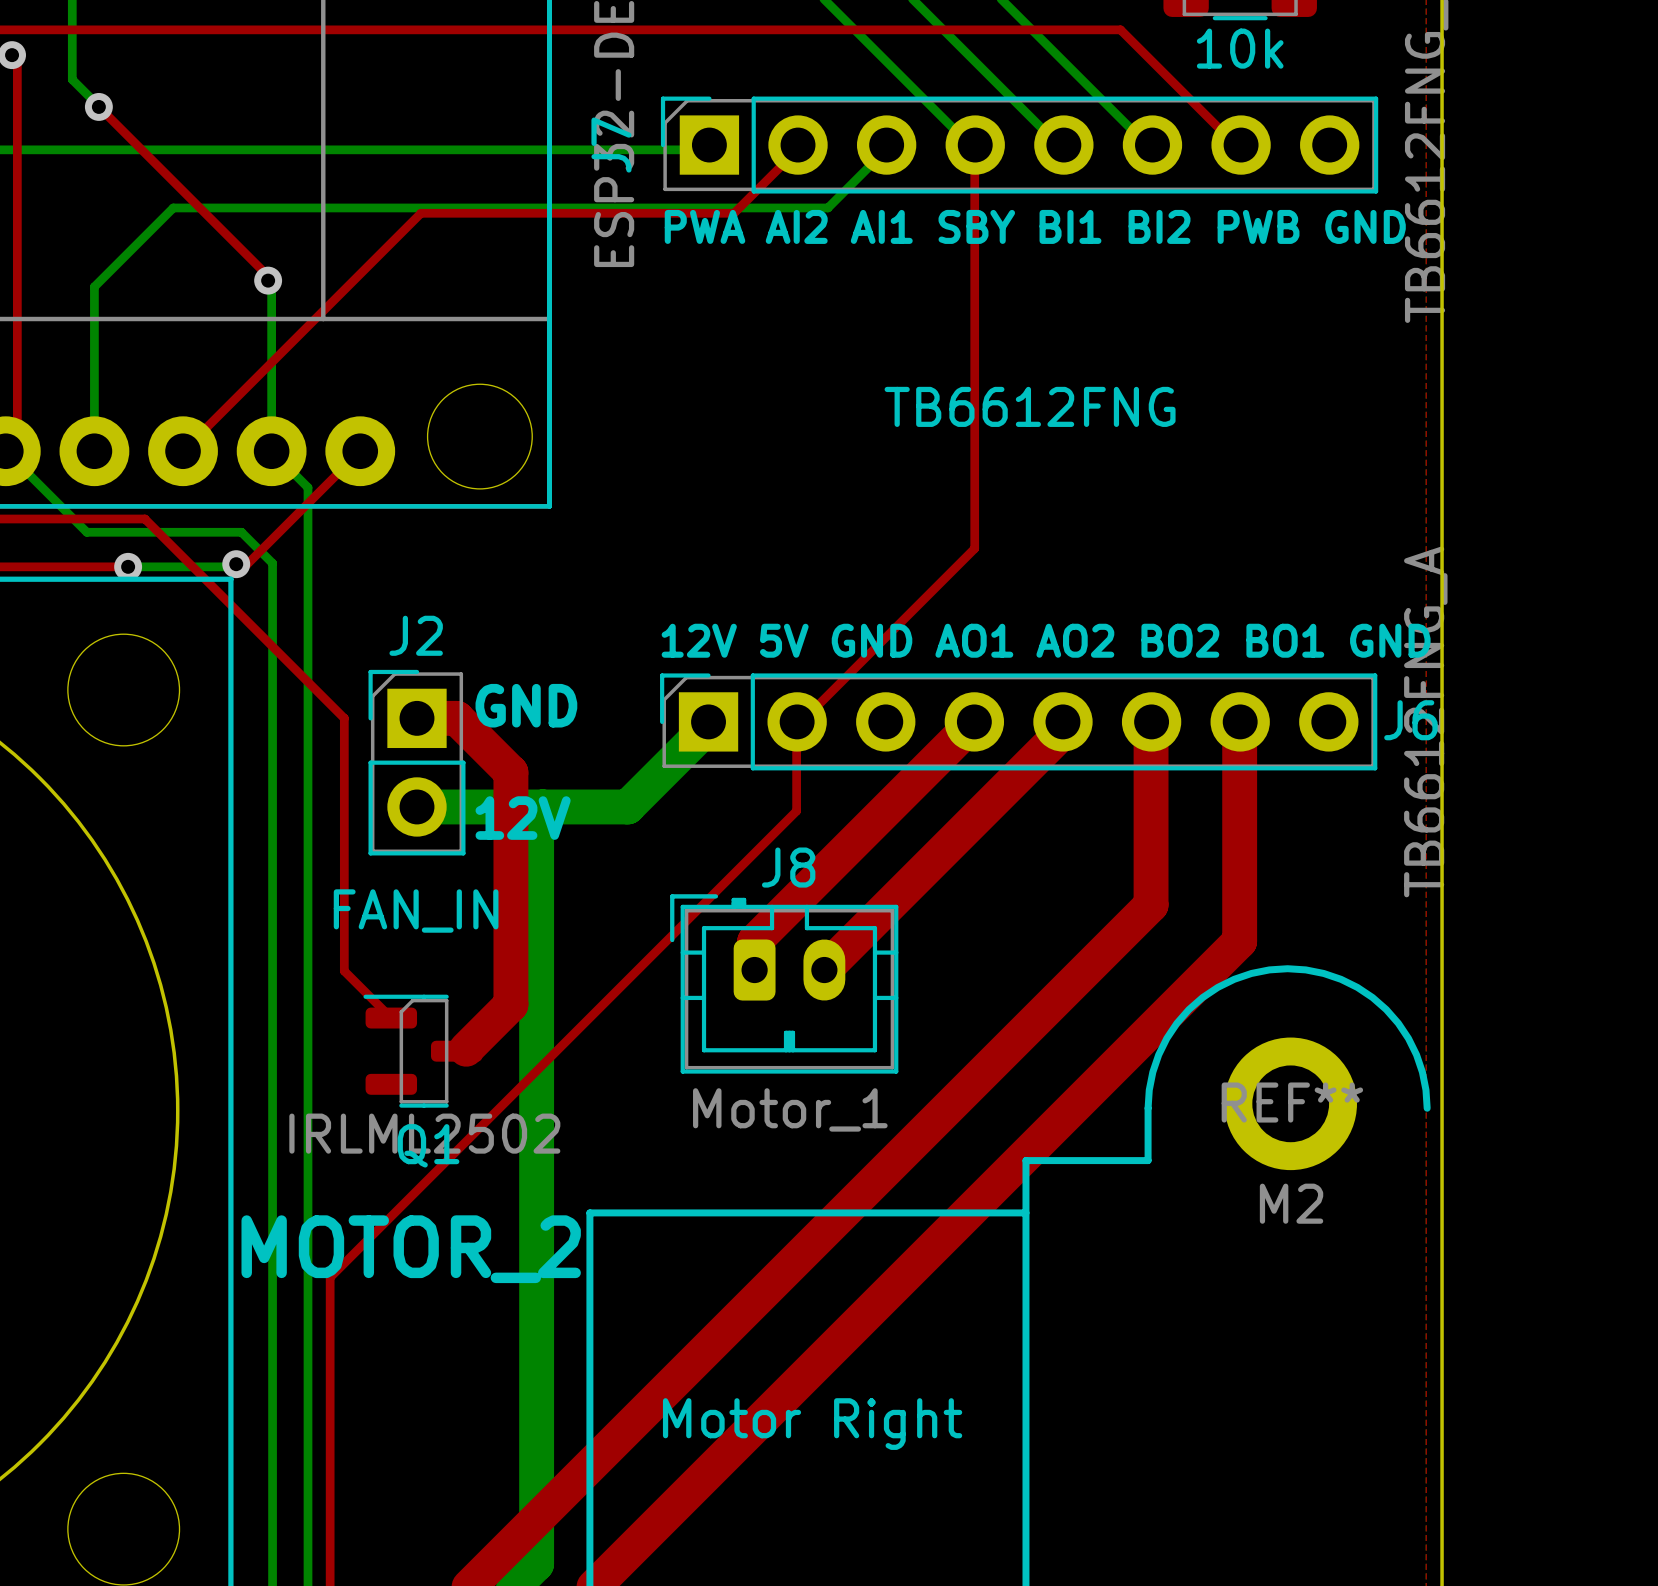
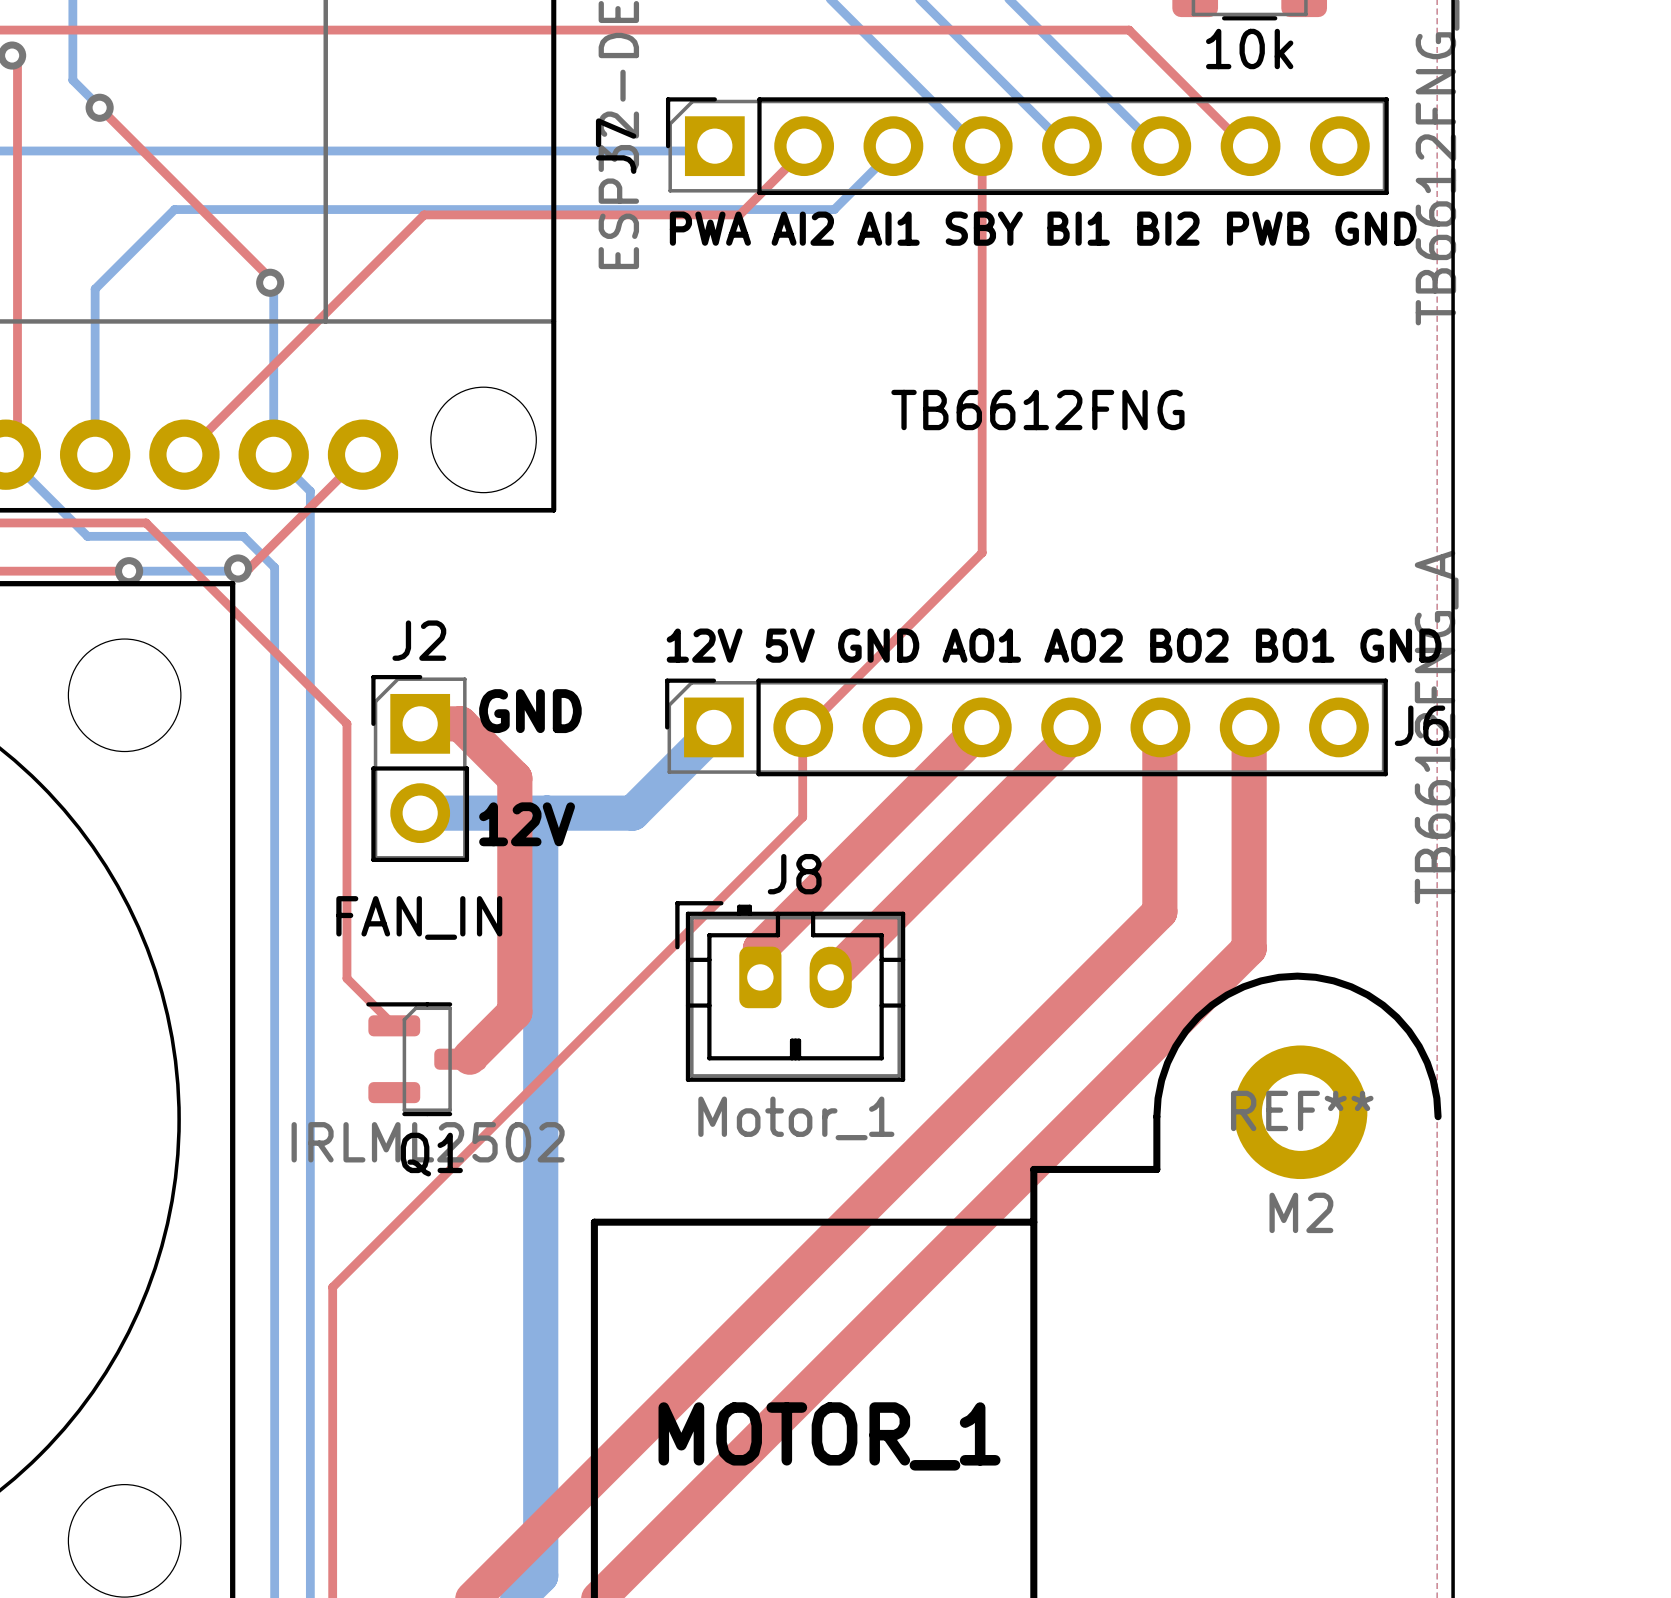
text: MOTOR_2 (411, 1249) -> none
text: Motor Right (812, 1424) -> MOTOR_1 (829, 1436)

